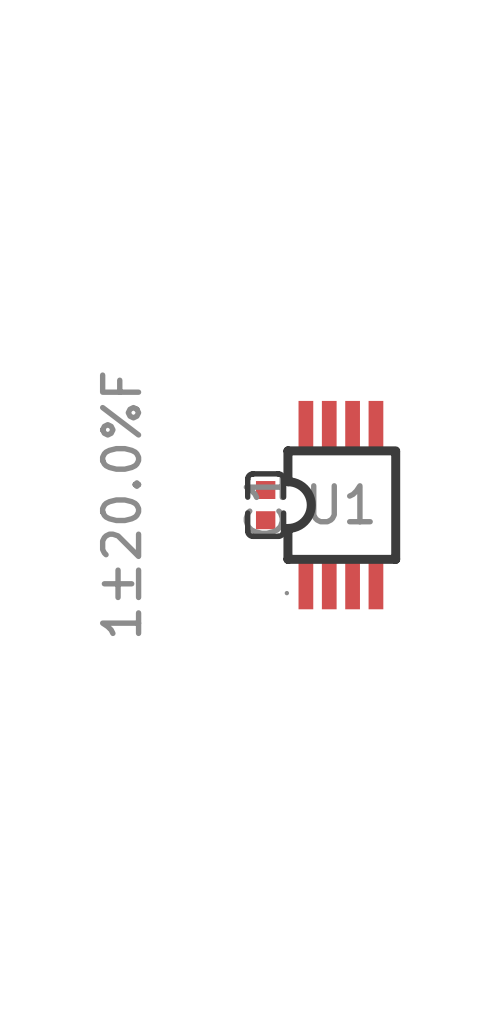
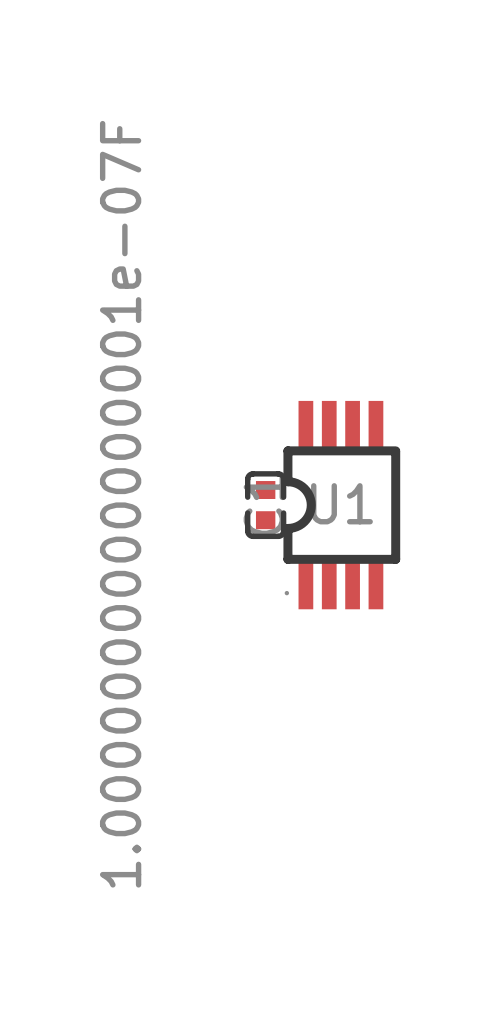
part value: 1±20.0%F (120, 504) -> 1.0000000000000001e-07F (120, 504)

